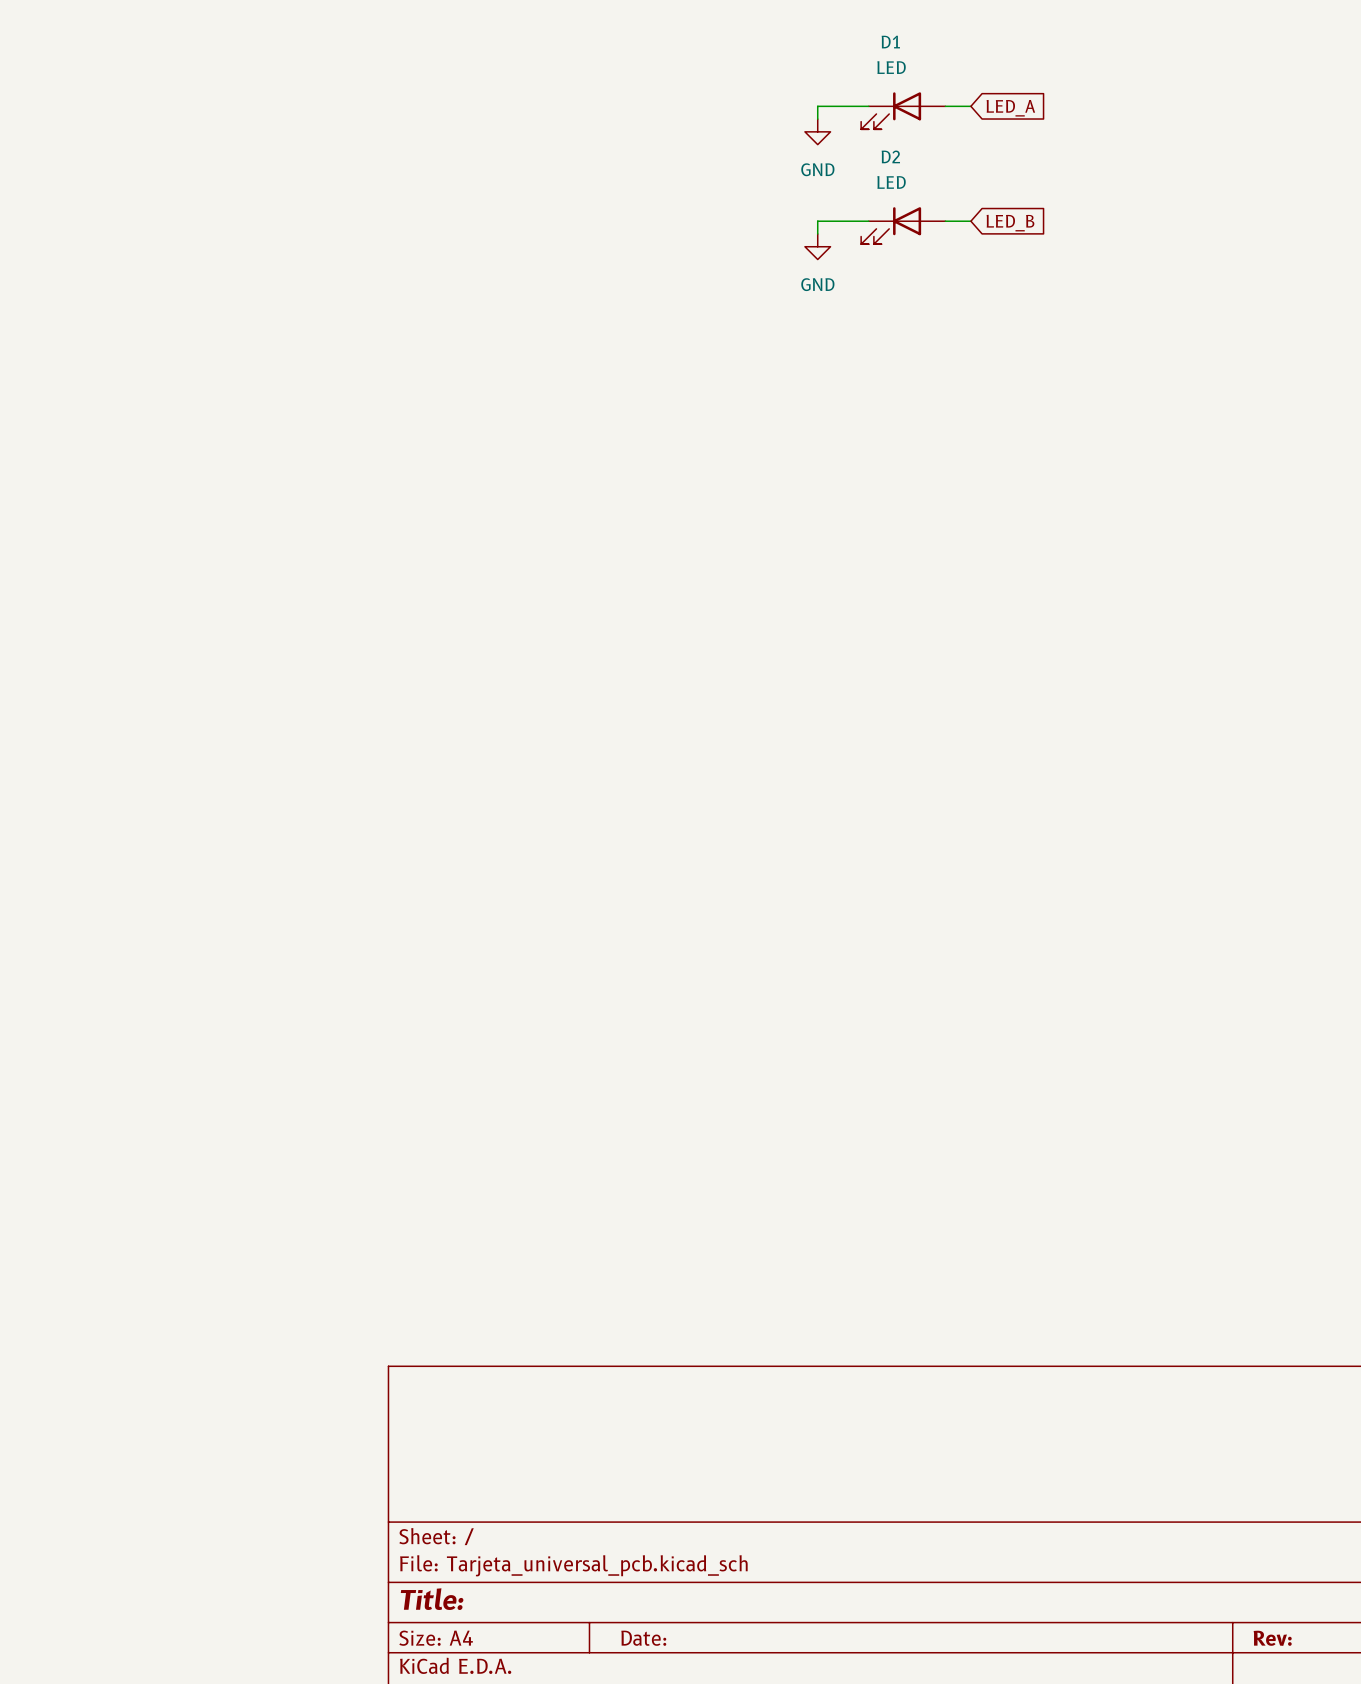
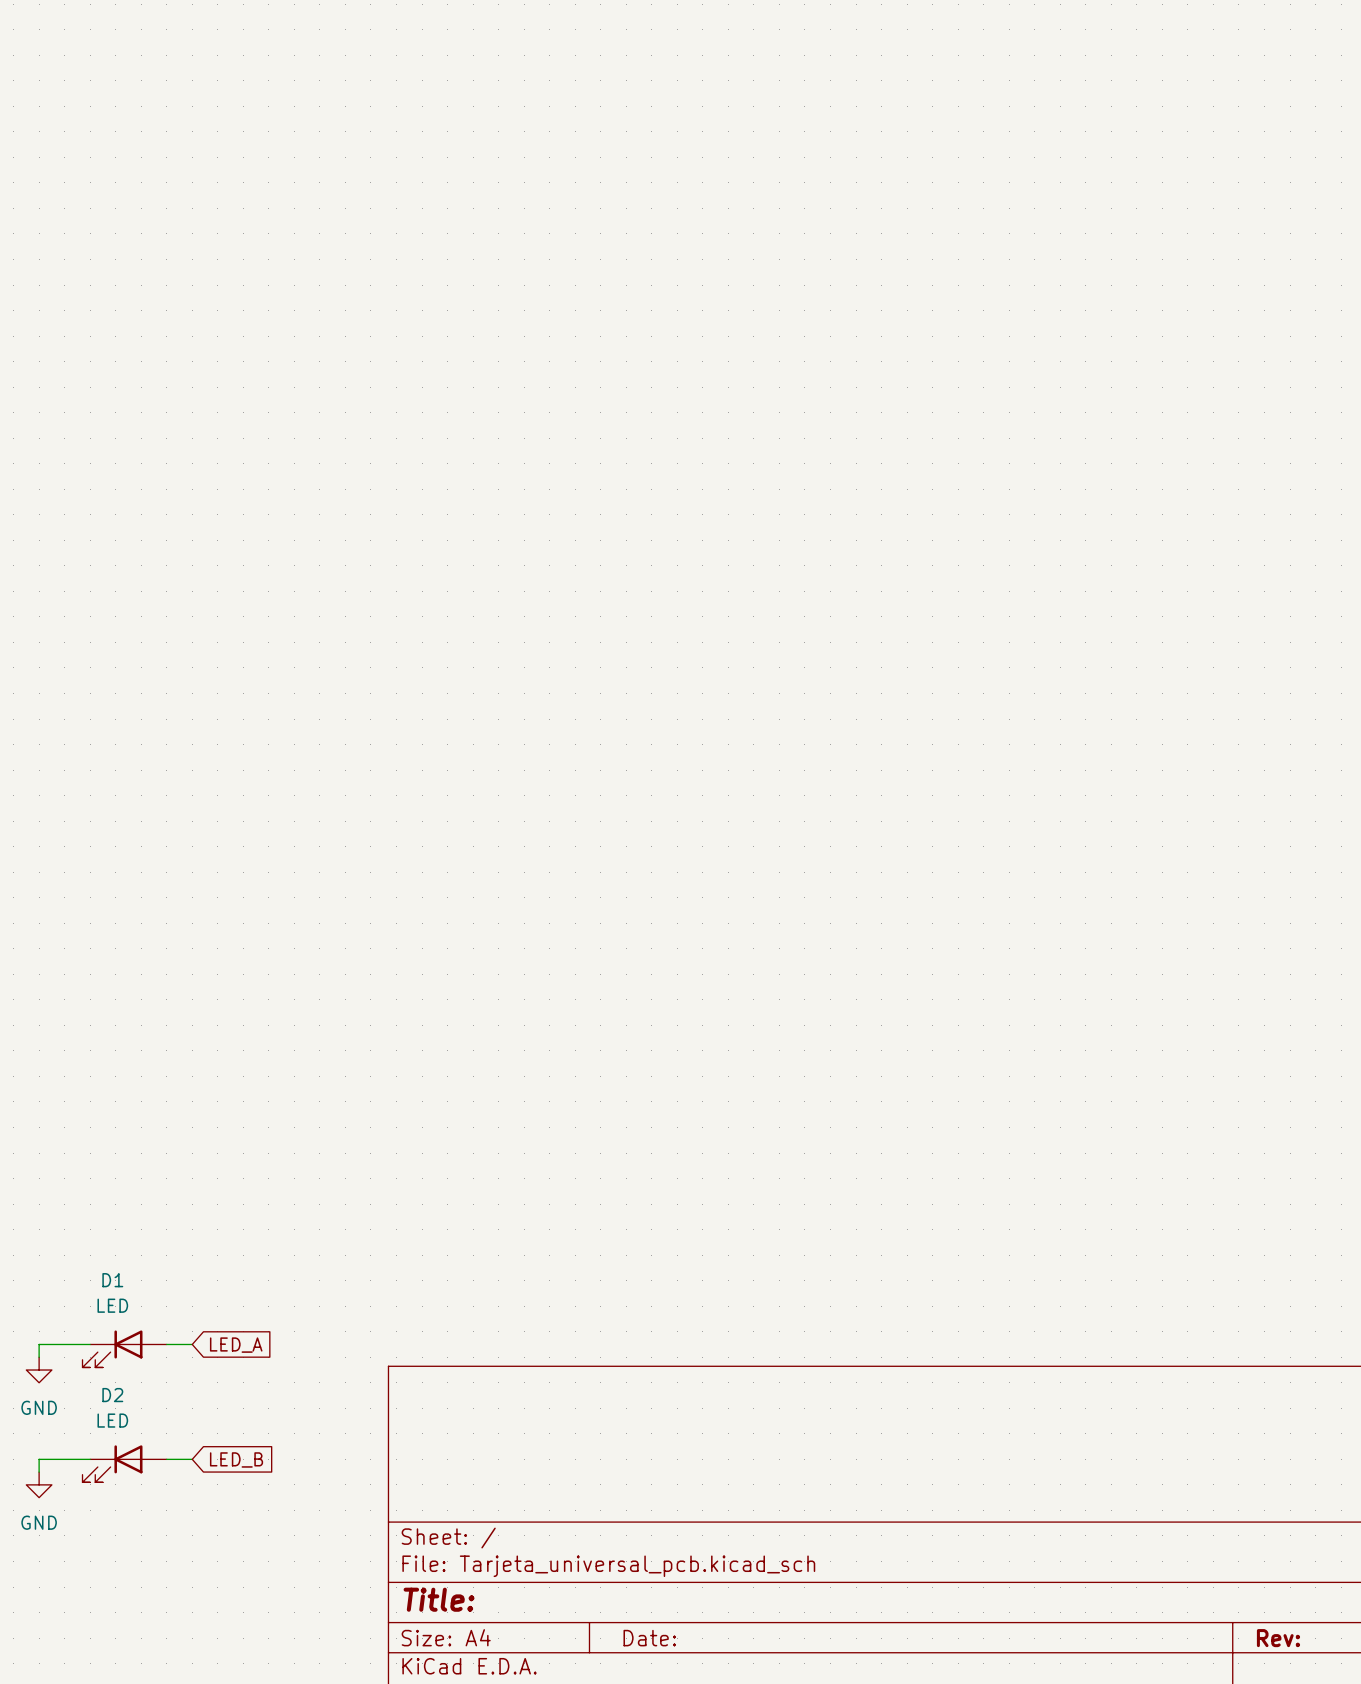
wire: (868, 106) (817, 106) (817, 119) -> none
wire: (945, 106) (970, 106) -> none
global label: LED_A (1010, 108) -> none
D1 position: (903, 110) -> (124, 1348)
power symbol: GND (817, 131) -> none
wire: (868, 221) (817, 221) (817, 233) -> none
wire: (945, 221) (970, 221) -> none
global label: LED_B (1010, 223) -> none
D2 position: (903, 225) -> (124, 1463)
power symbol: GND (817, 246) -> none
wire: none -> (90, 1344) (39, 1344) (39, 1357)
wire: none -> (166, 1344) (192, 1344)
global label: none -> LED_A (236, 1345)
power symbol: none -> GND (39, 1370)
wire: none -> (90, 1459) (39, 1459) (39, 1472)
wire: none -> (166, 1459) (192, 1459)
global label: none -> LED_B (236, 1459)
power symbol: none -> GND (39, 1484)

